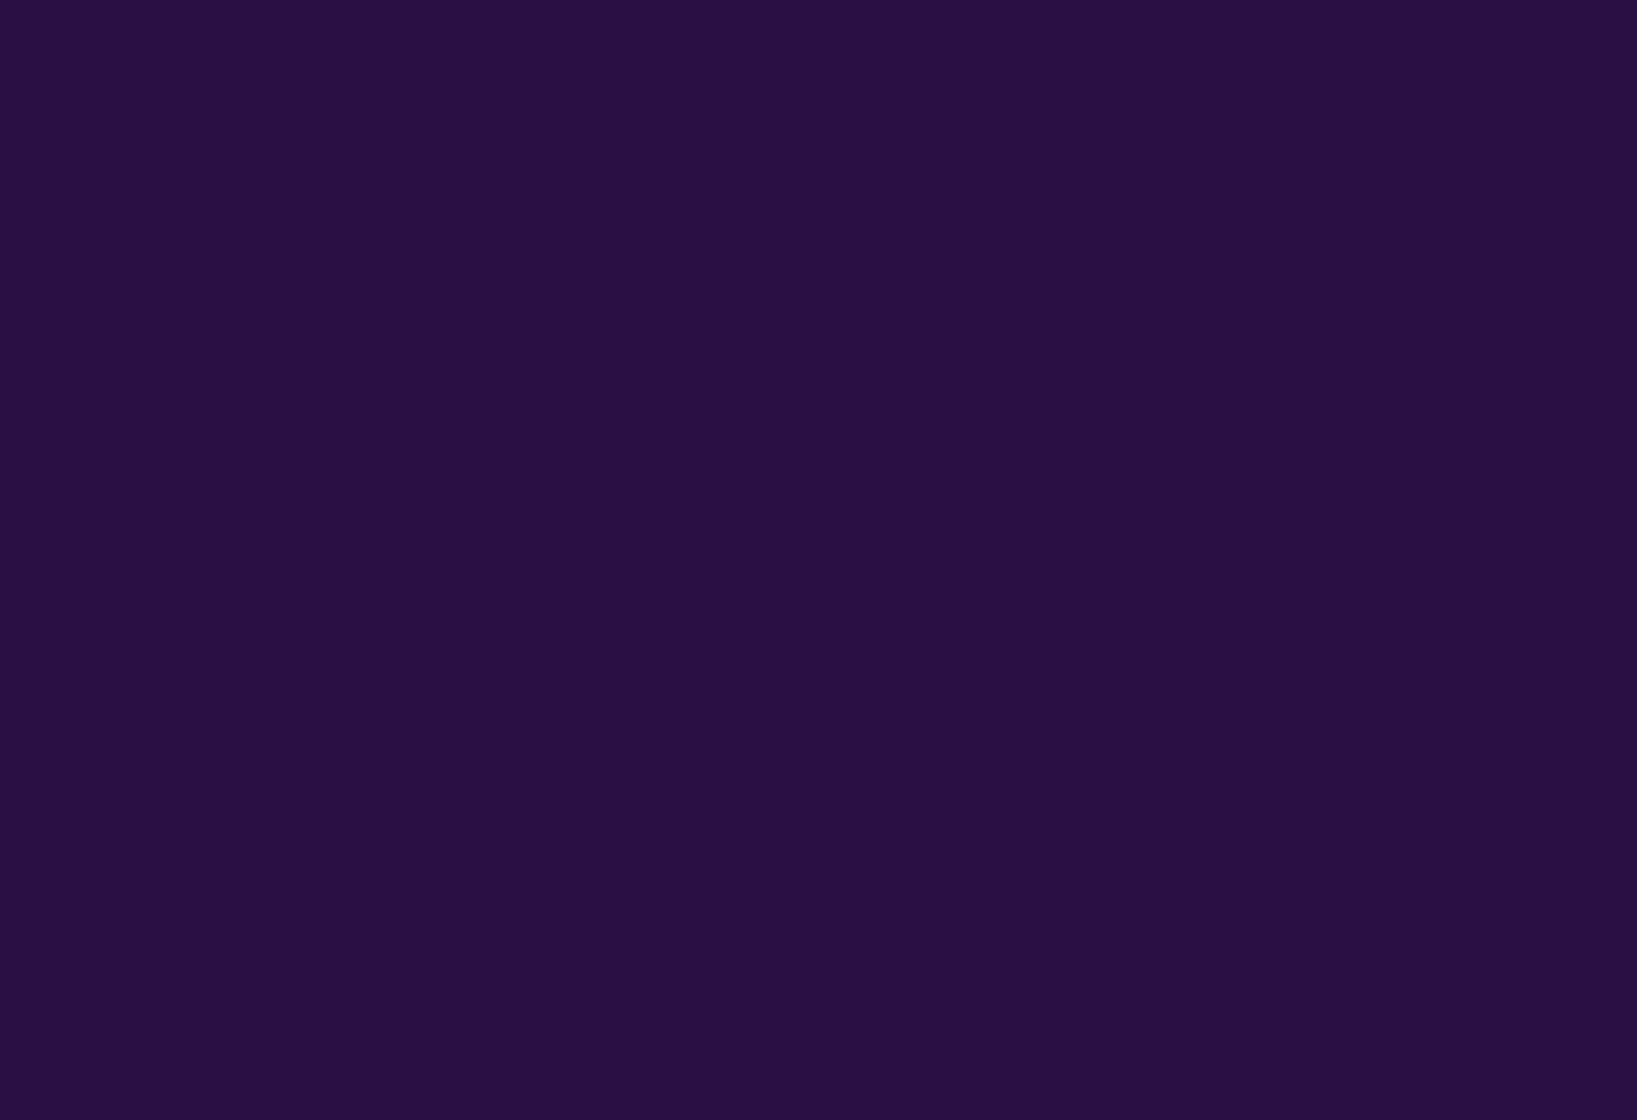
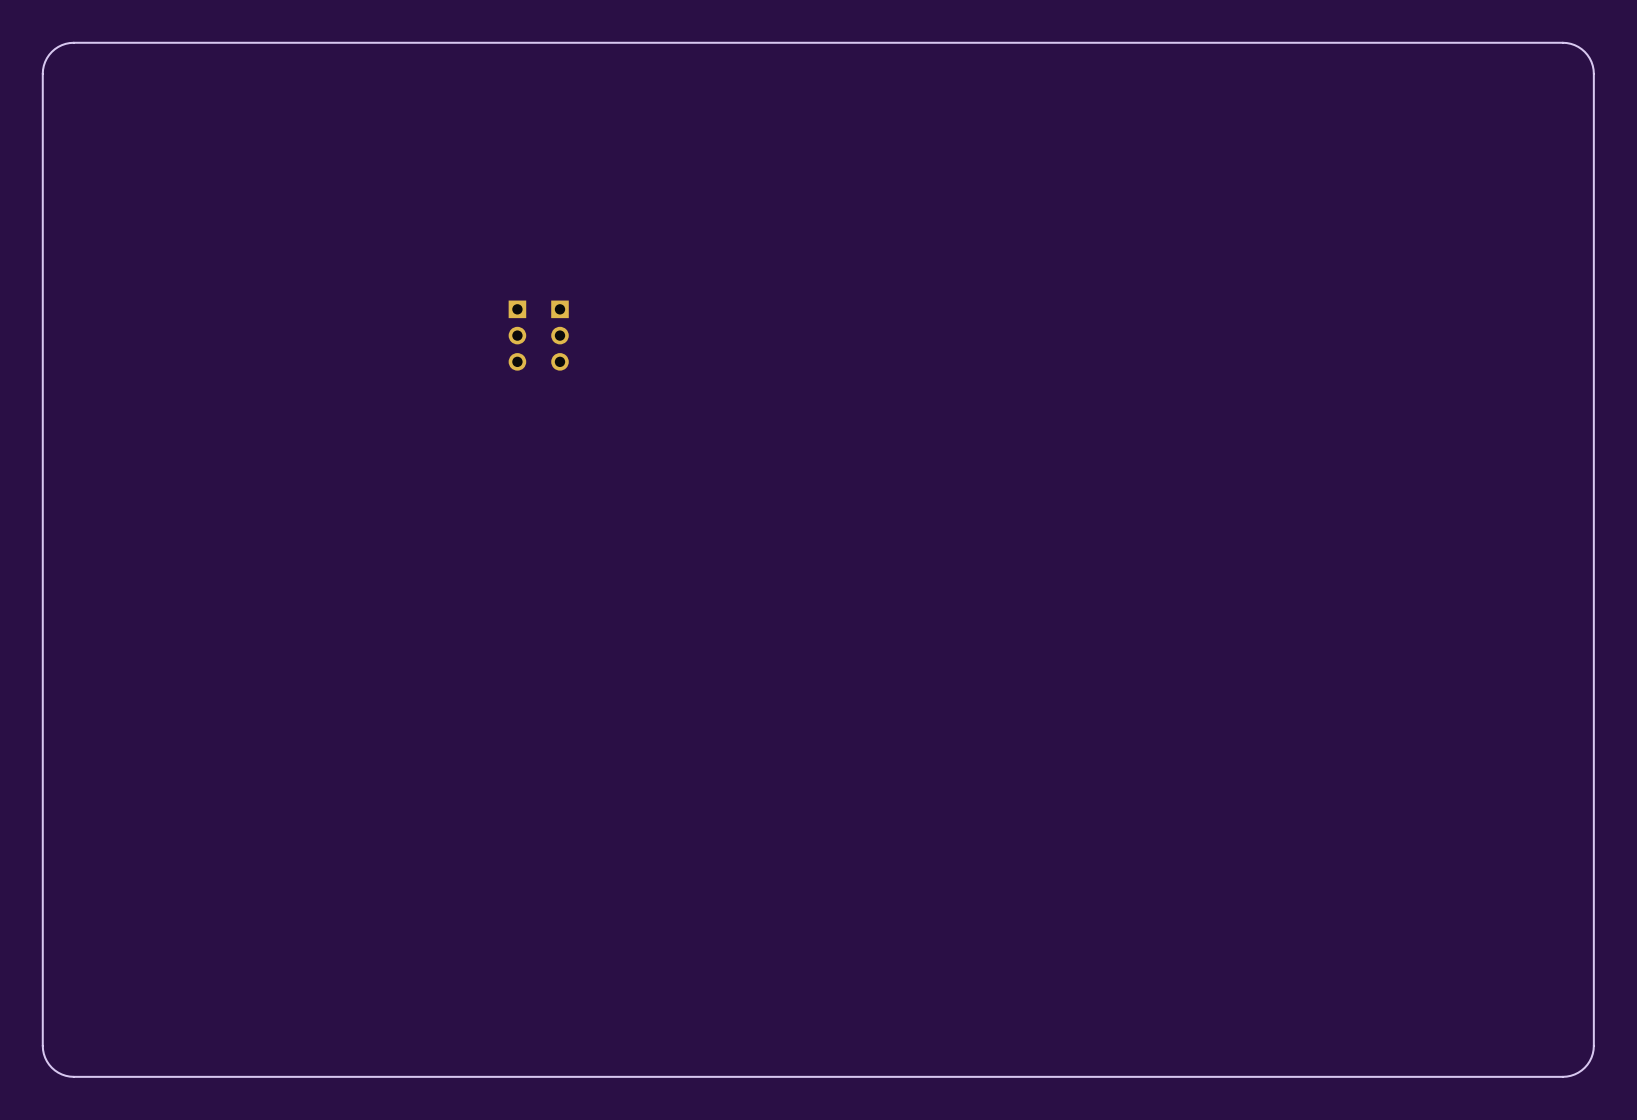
board edge: none -> (1562, 42) (73, 42) (61, 45) (54, 49) (46, 58) (42, 73) (42, 1045) (45, 1057) (49, 1064) (58, 1072) (73, 1076) (1562, 1076) (1574, 1074) (1581, 1070) (1589, 1061) (1593, 1045) (1593, 73) (1591, 61) (1584, 51) (1574, 45) (1562, 42)
part: none -> (517, 335)
part: none -> (559, 335)

